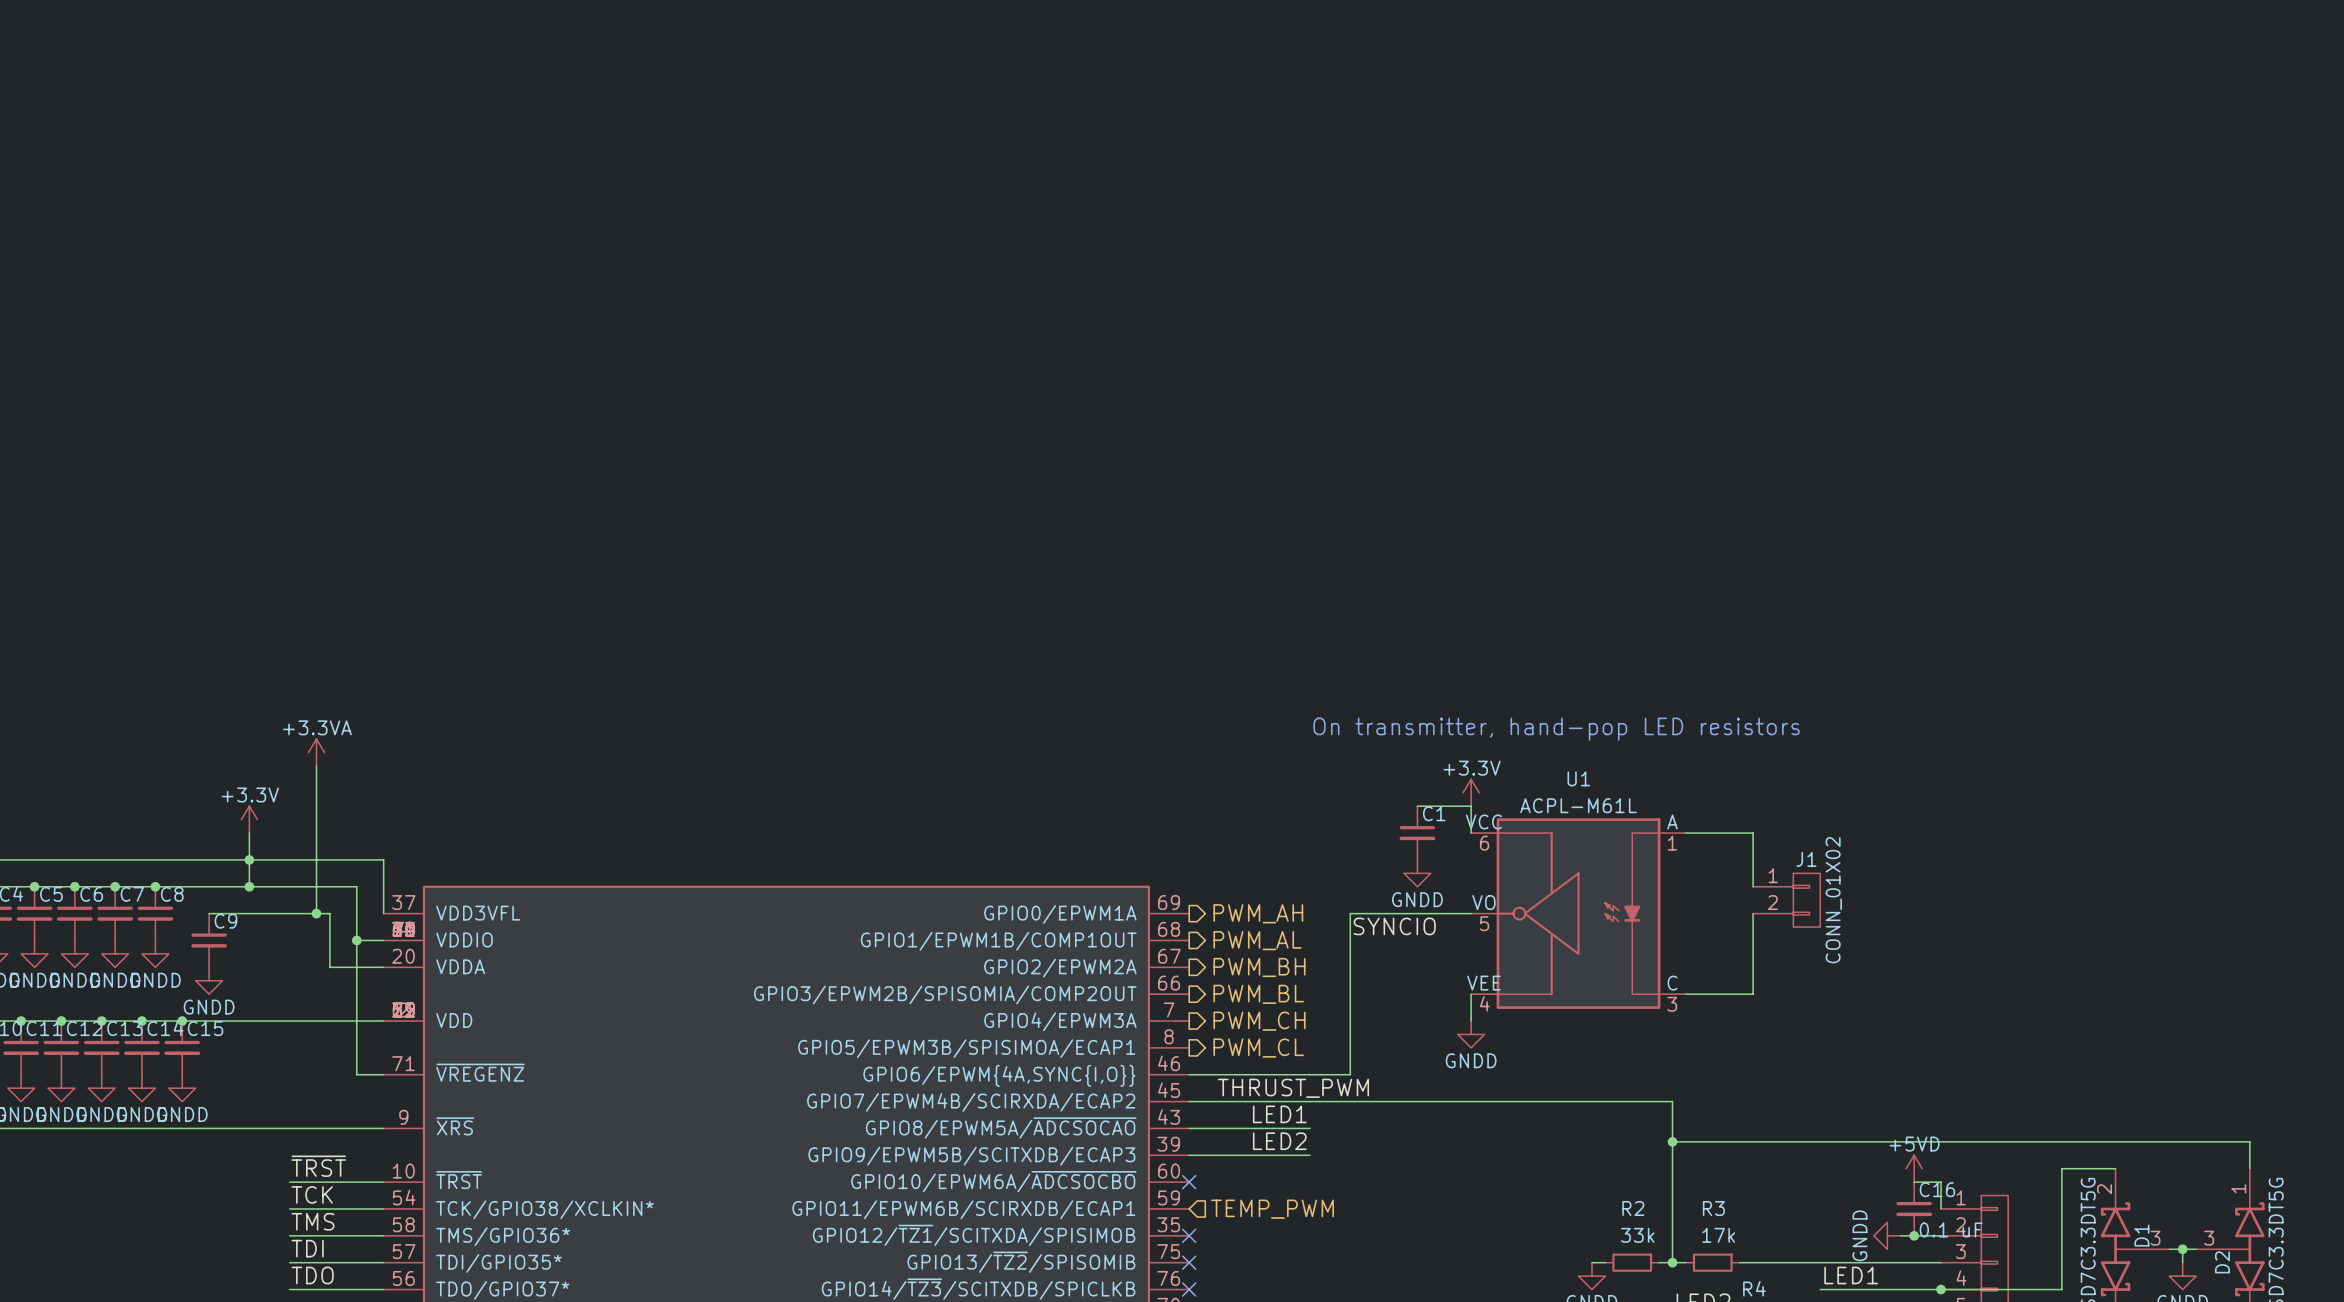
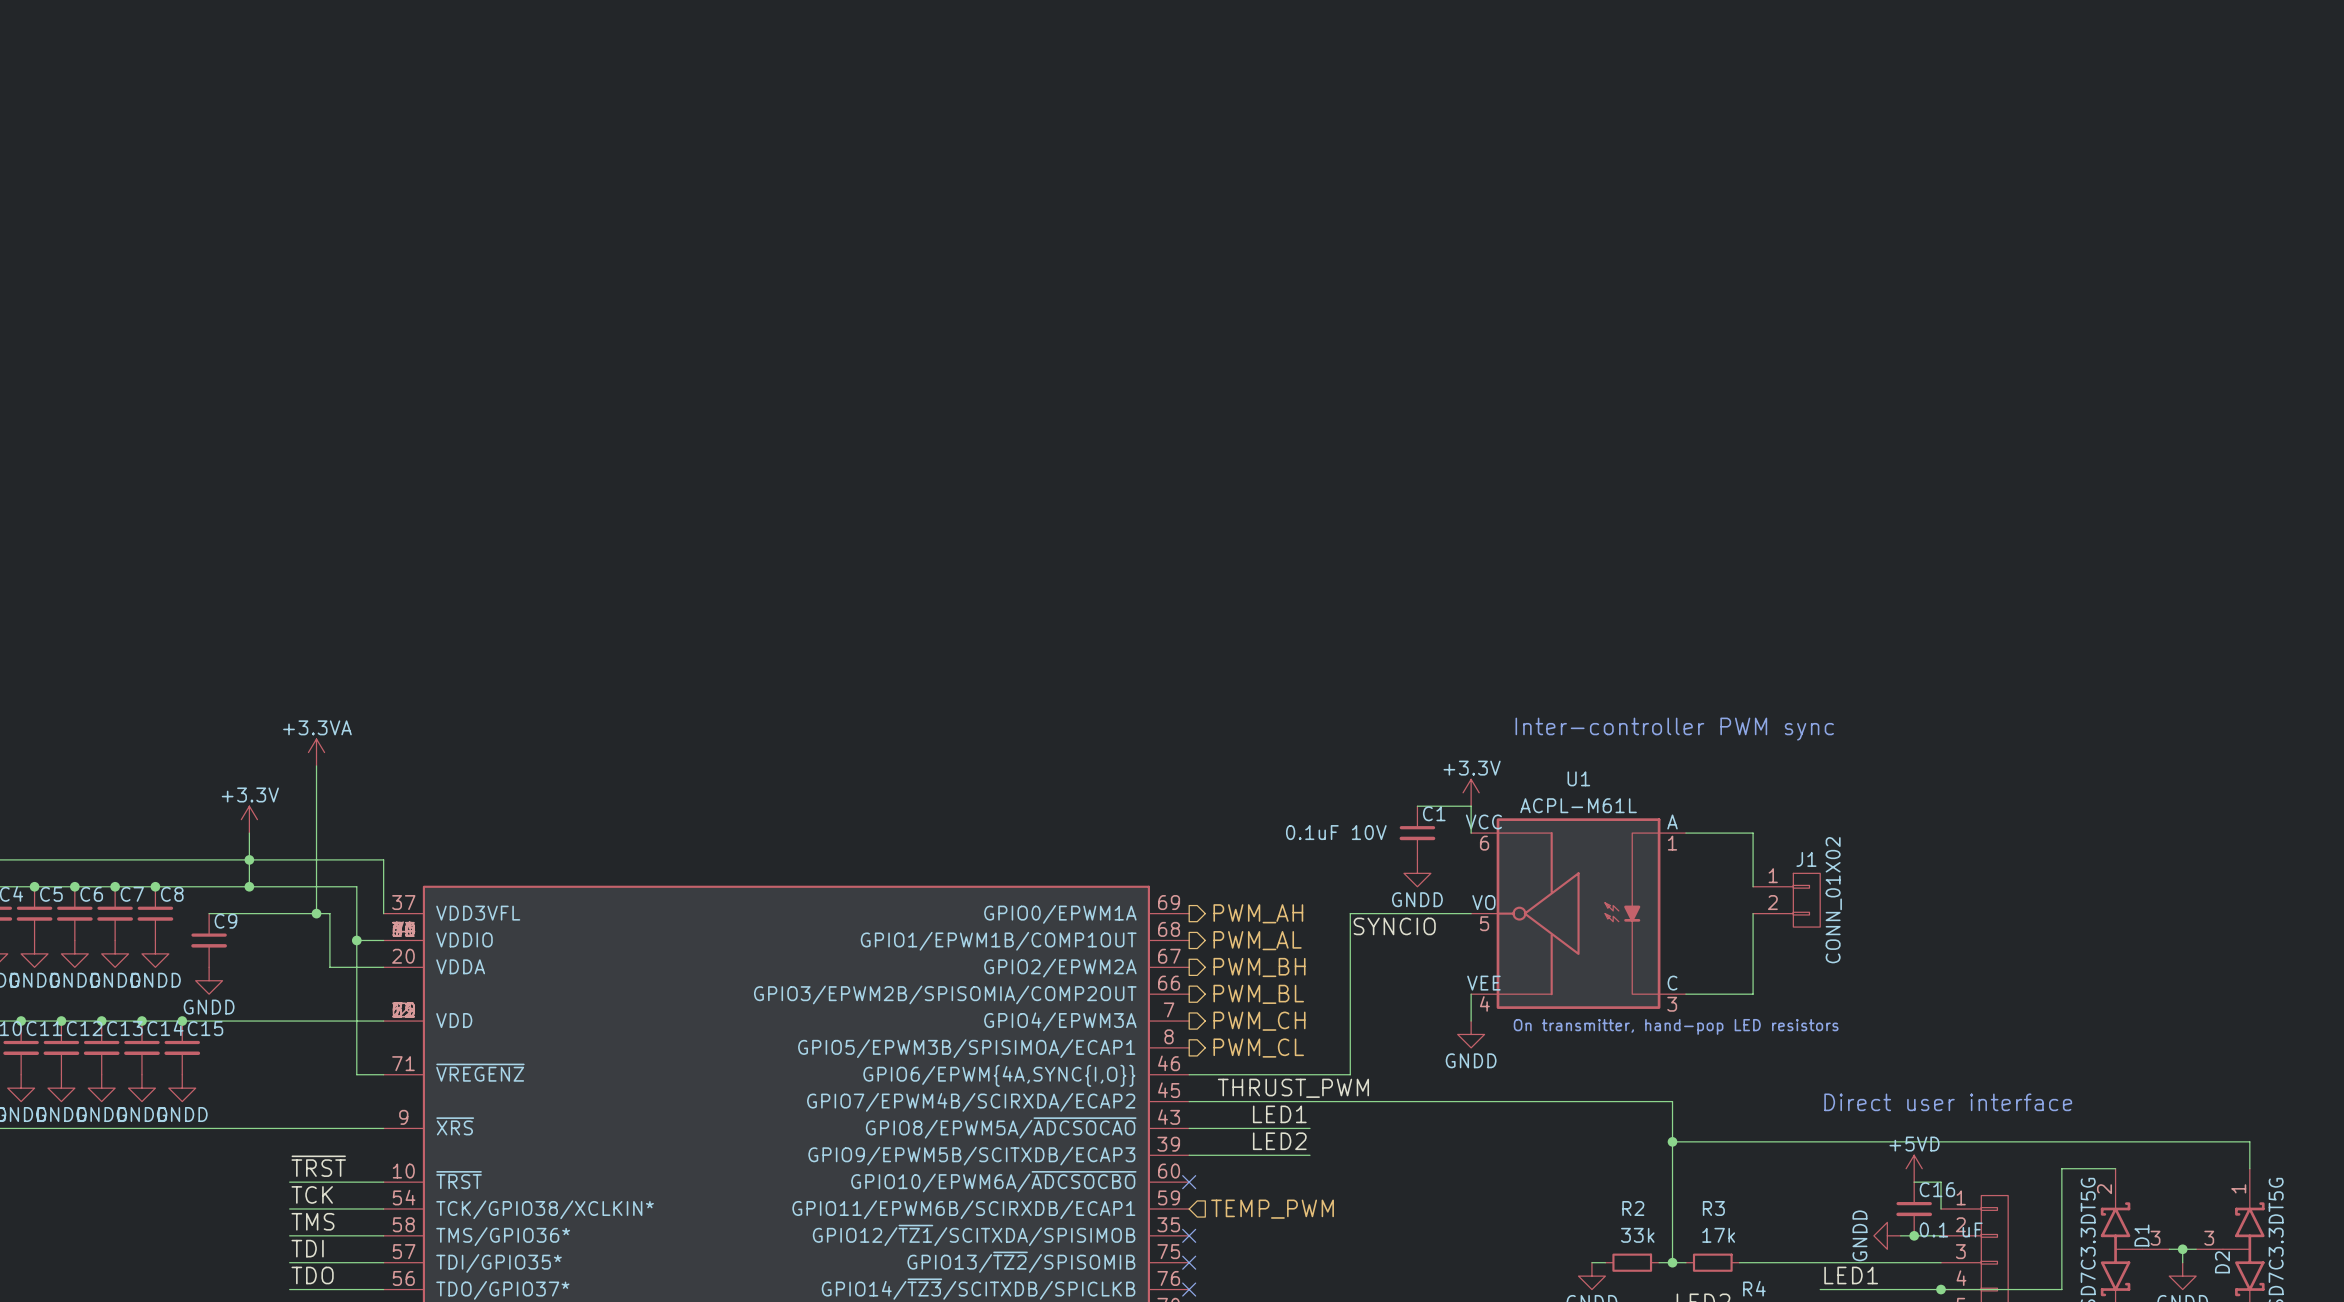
text: On transmitter, hand-pop LED resistors (1556, 729) -> none
text: none -> Inter-controller PWM sync (1674, 729)
C1 value: none -> 0.1uF 10V (1336, 832)
text: none -> On transmitter, hand-pop LED resistors (1676, 1026)
text: none -> Direct user interface (1948, 1102)

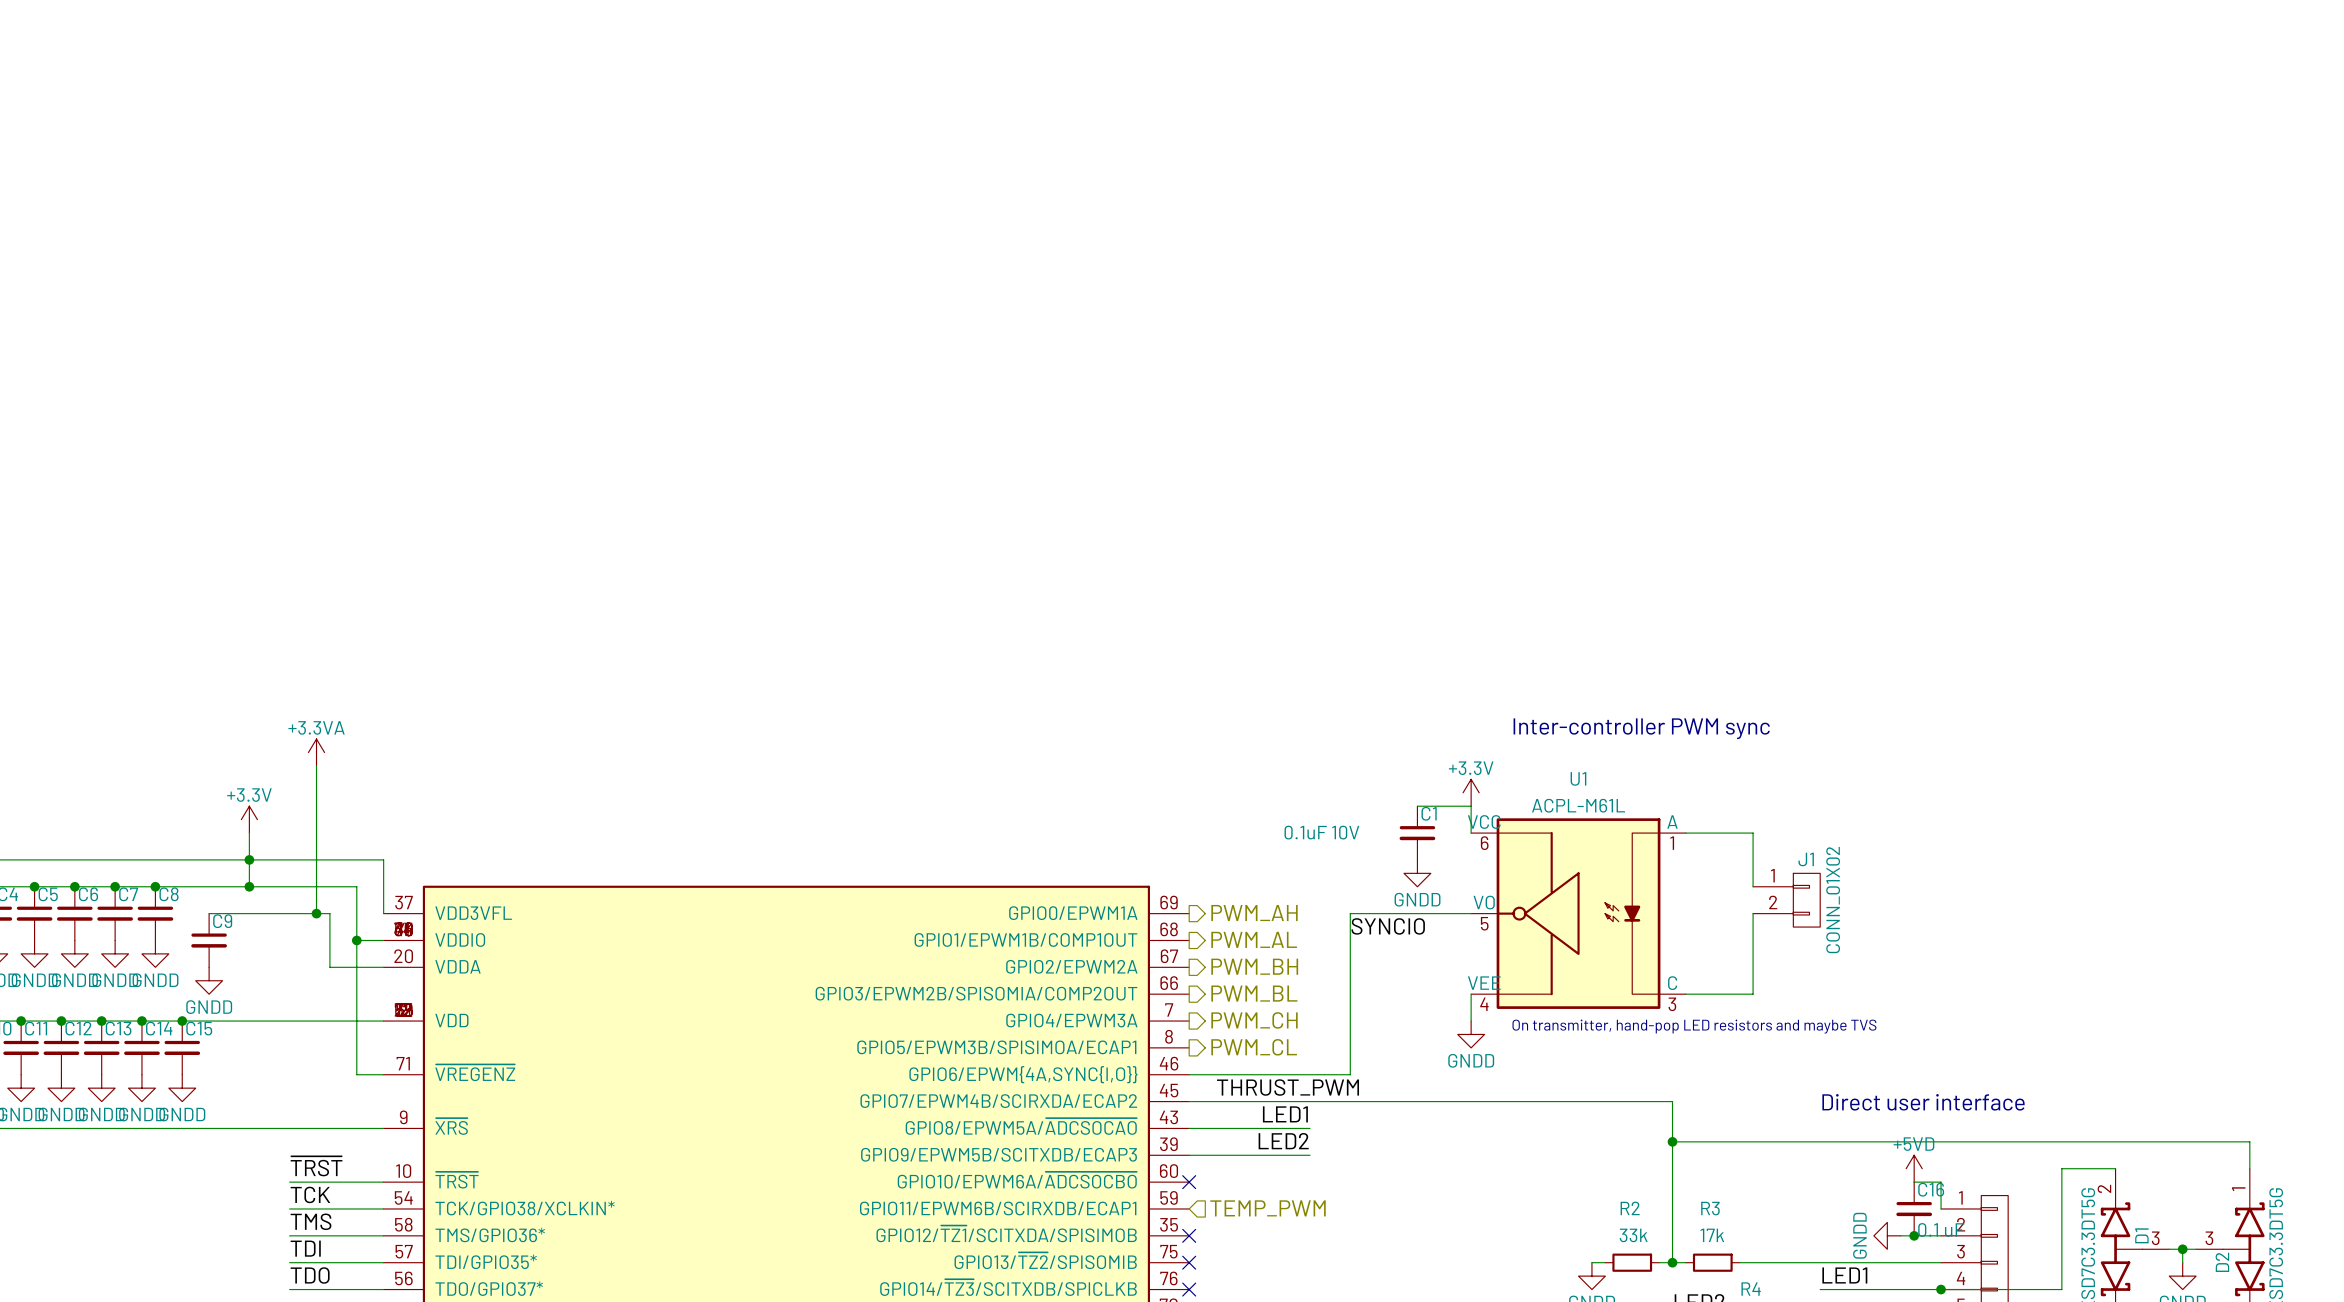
text: On transmitter, hand-pop LED resistors (1676, 1026) -> On transmitter, hand-pop LED resistors and maybe TVS (1694, 1026)

